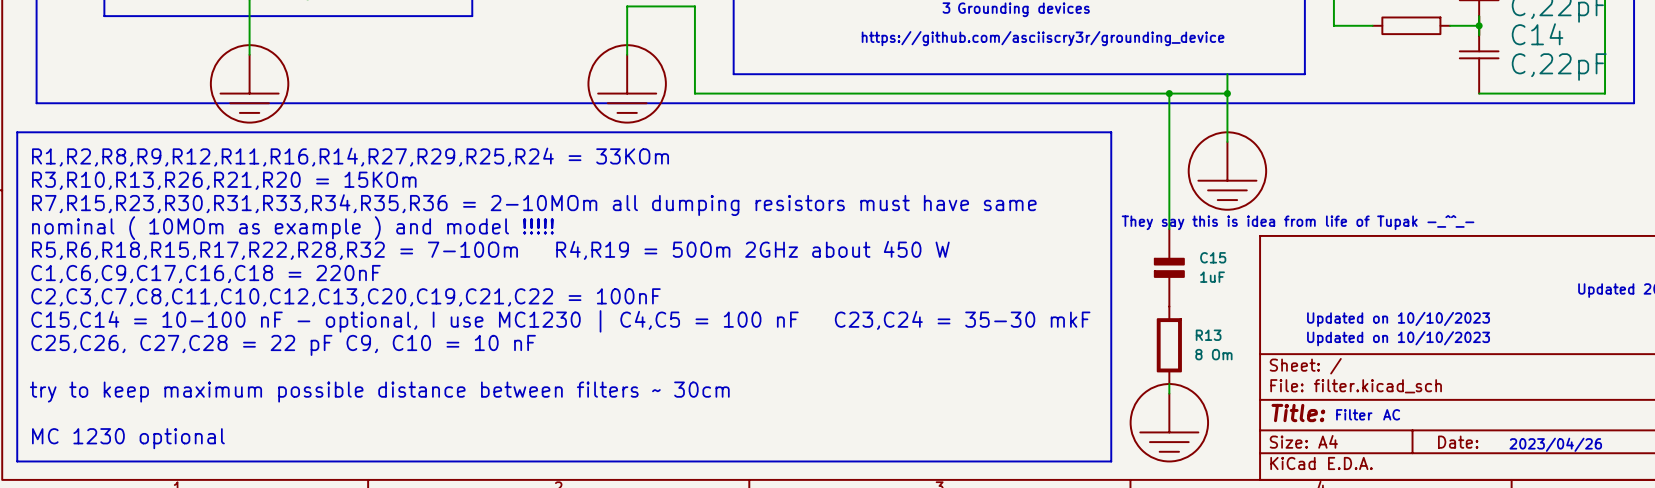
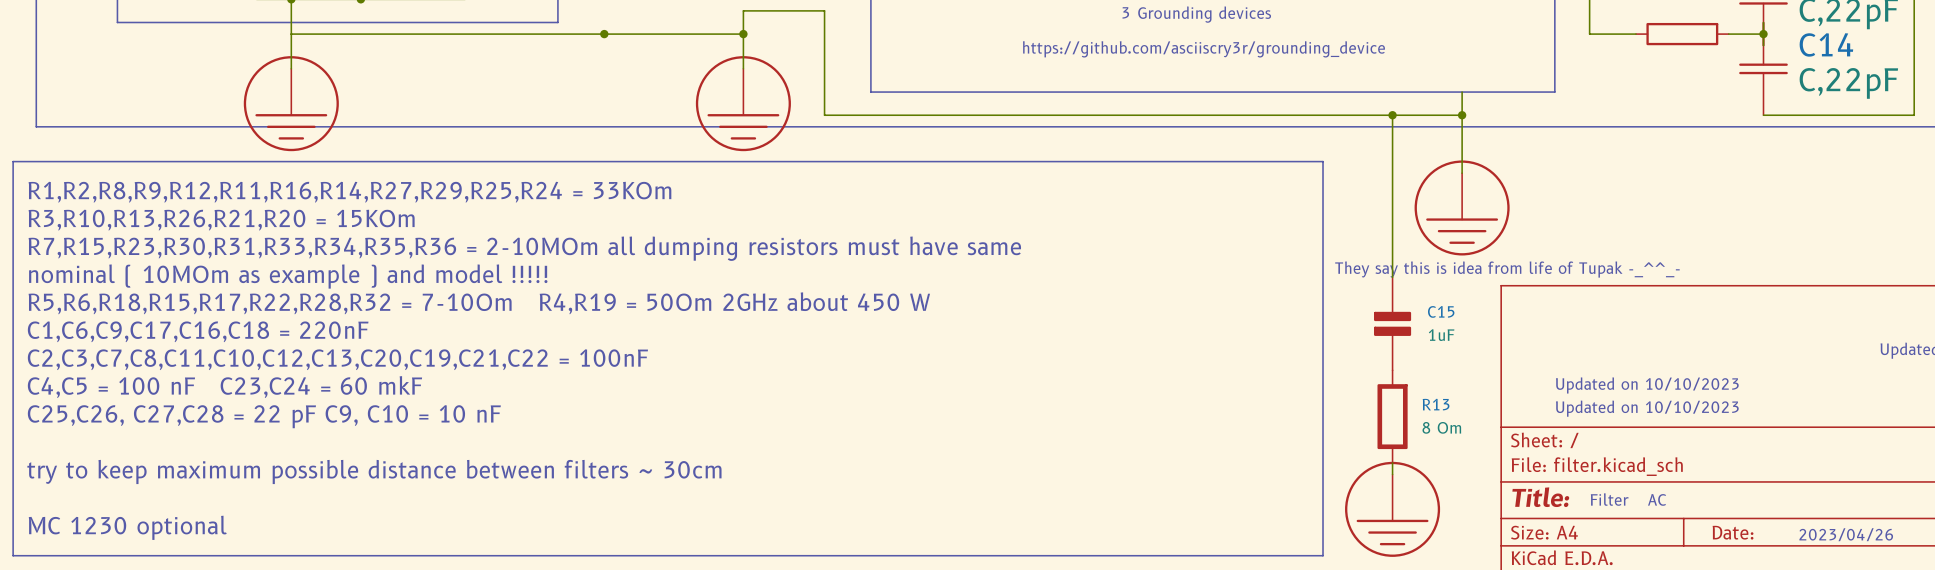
wire: none -> (291, 34) (743, 34)
junction: none -> (604, 34)
junction: none -> (743, 34)
text: C15,C14 = 10-100 nF - optional, I use MC1230 | C4,C5 = 100 nF C23,C24 = 35-30 mkF (560, 321) -> C4,C5 = 100 nF C23,C24 = 60 mkF (224, 387)

